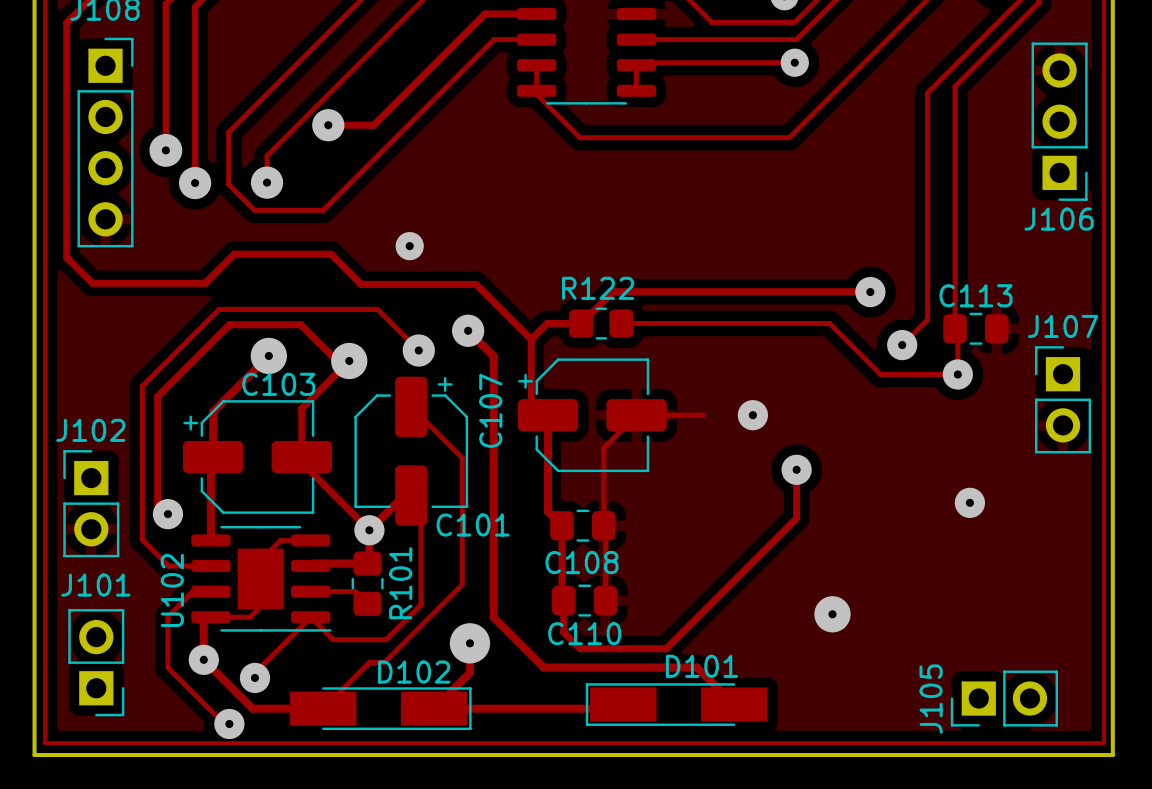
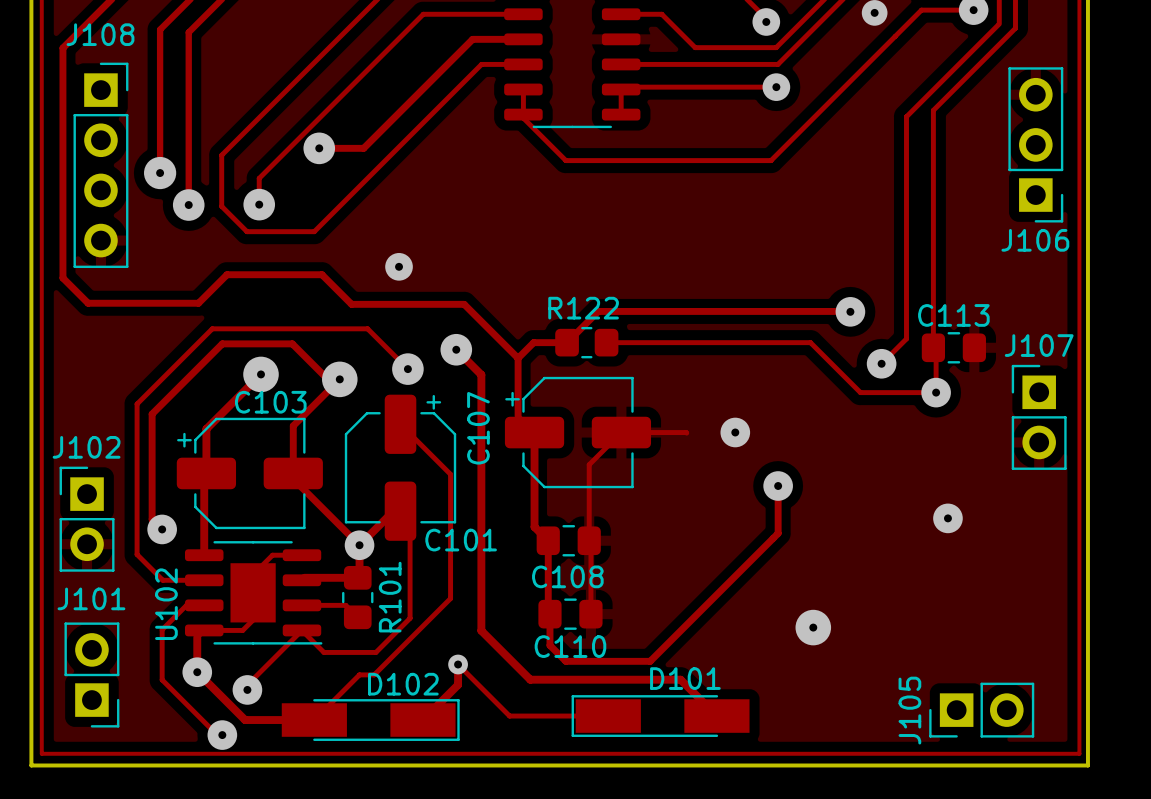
via size: [449, 623, 491, 664] -> [448, 654, 468, 675]
track: (623, 704) (619, 708) (434, 708) -> (608, 716) (509, 716) (458, 664)

